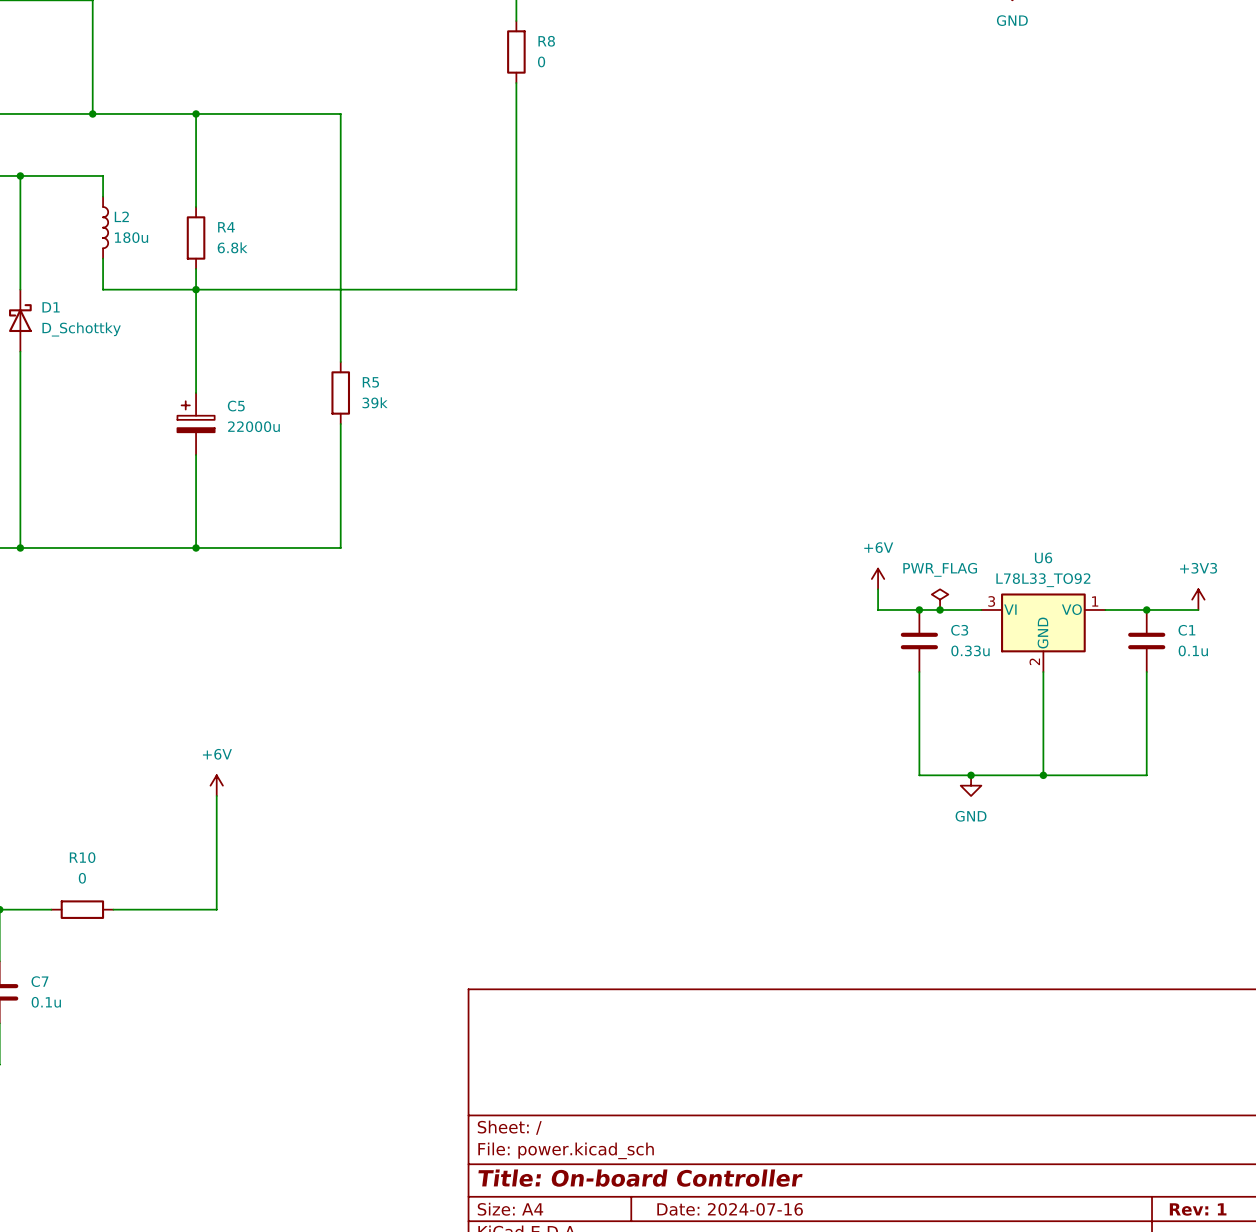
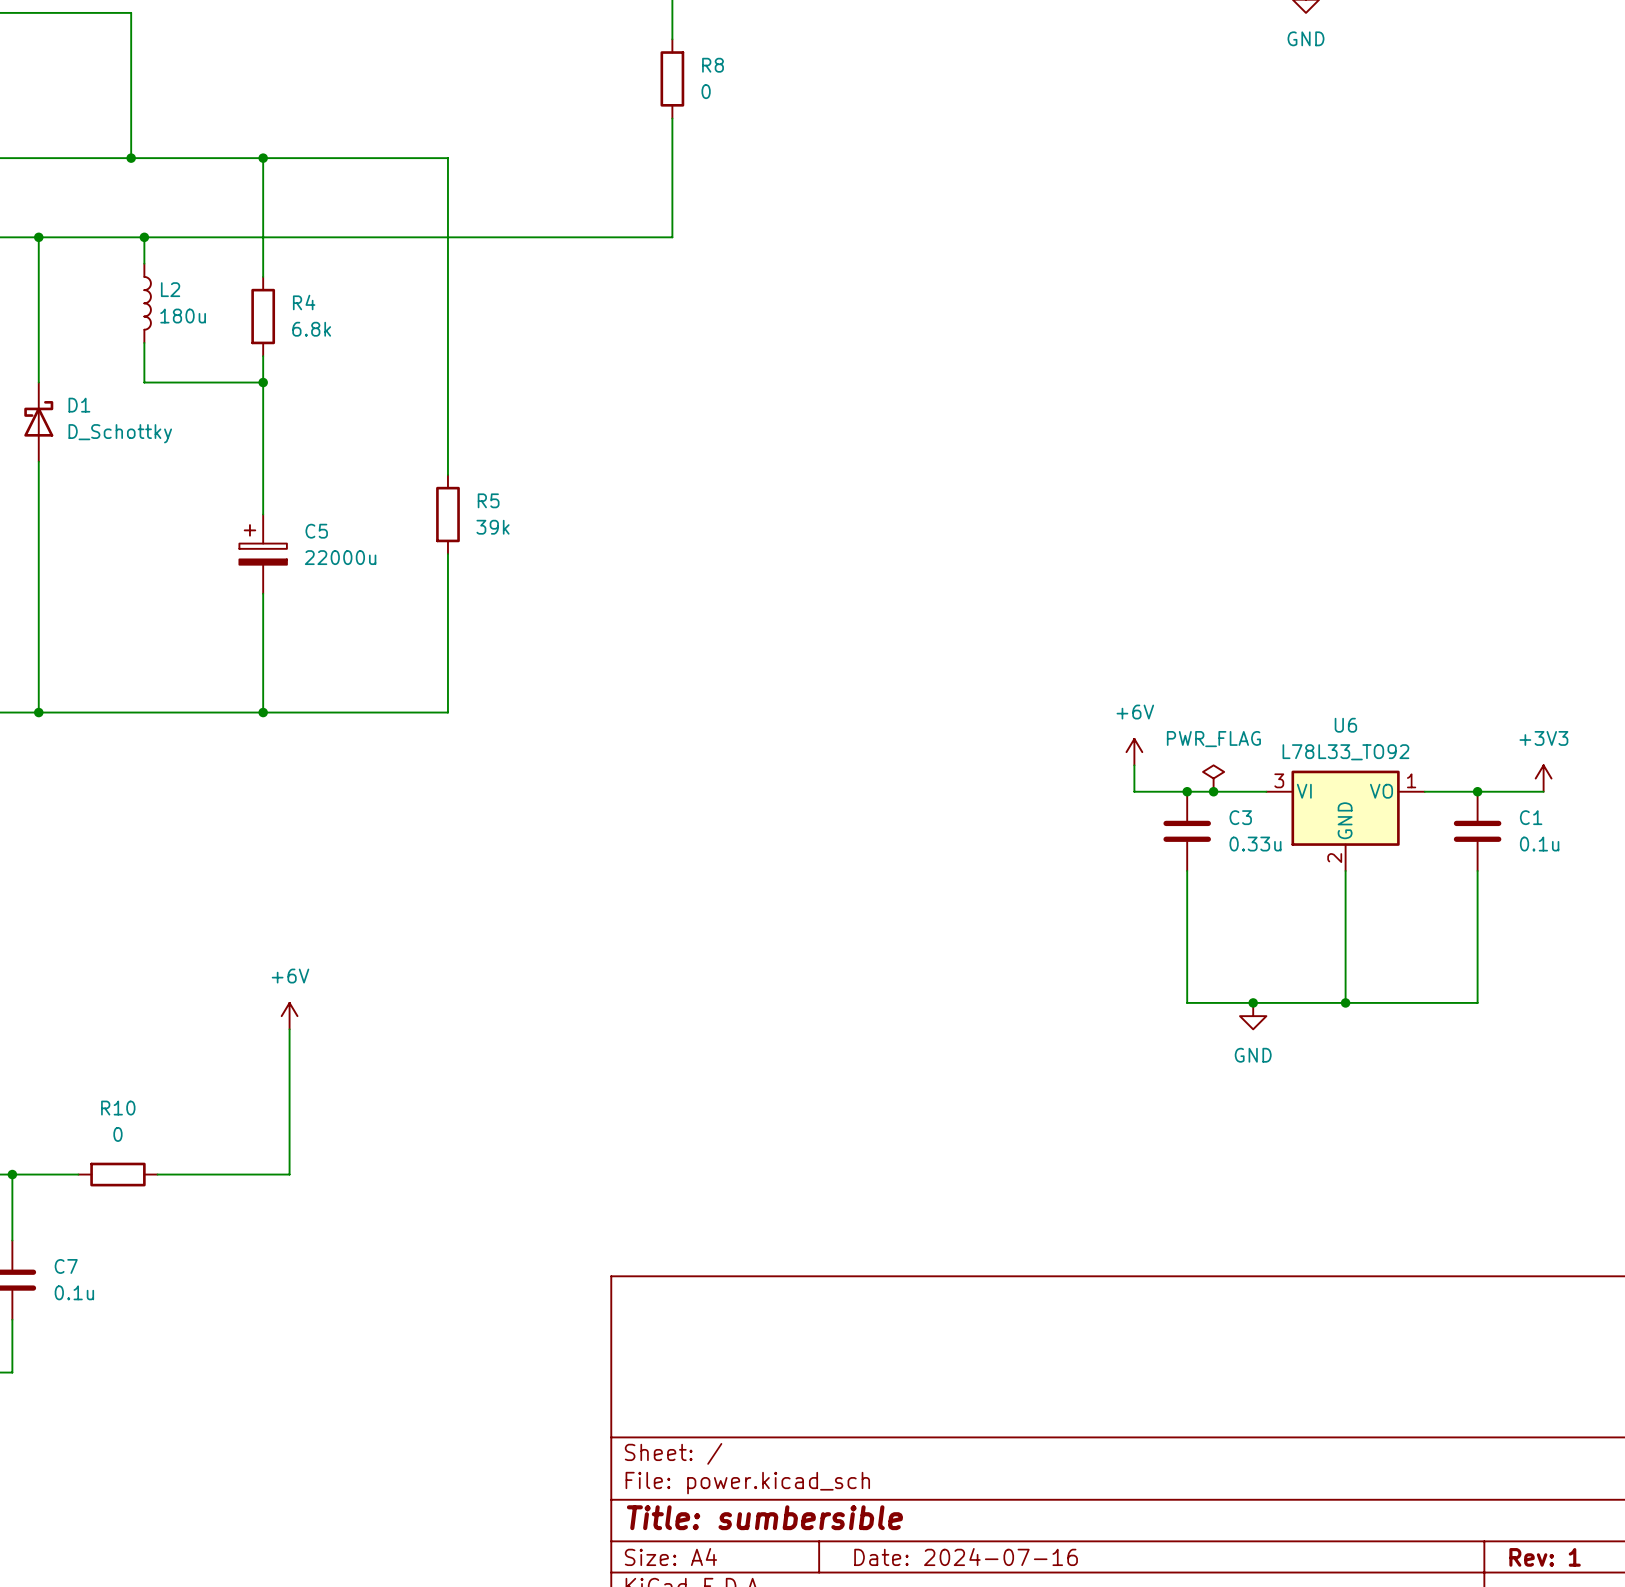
junction: none -> (144, 237)
wire: (516, 175) (516, 289) (196, 289) -> (672, 237) (144, 237)
title block: Title: On-board Controller (640, 1178) -> Title: sumbersible (764, 1517)

